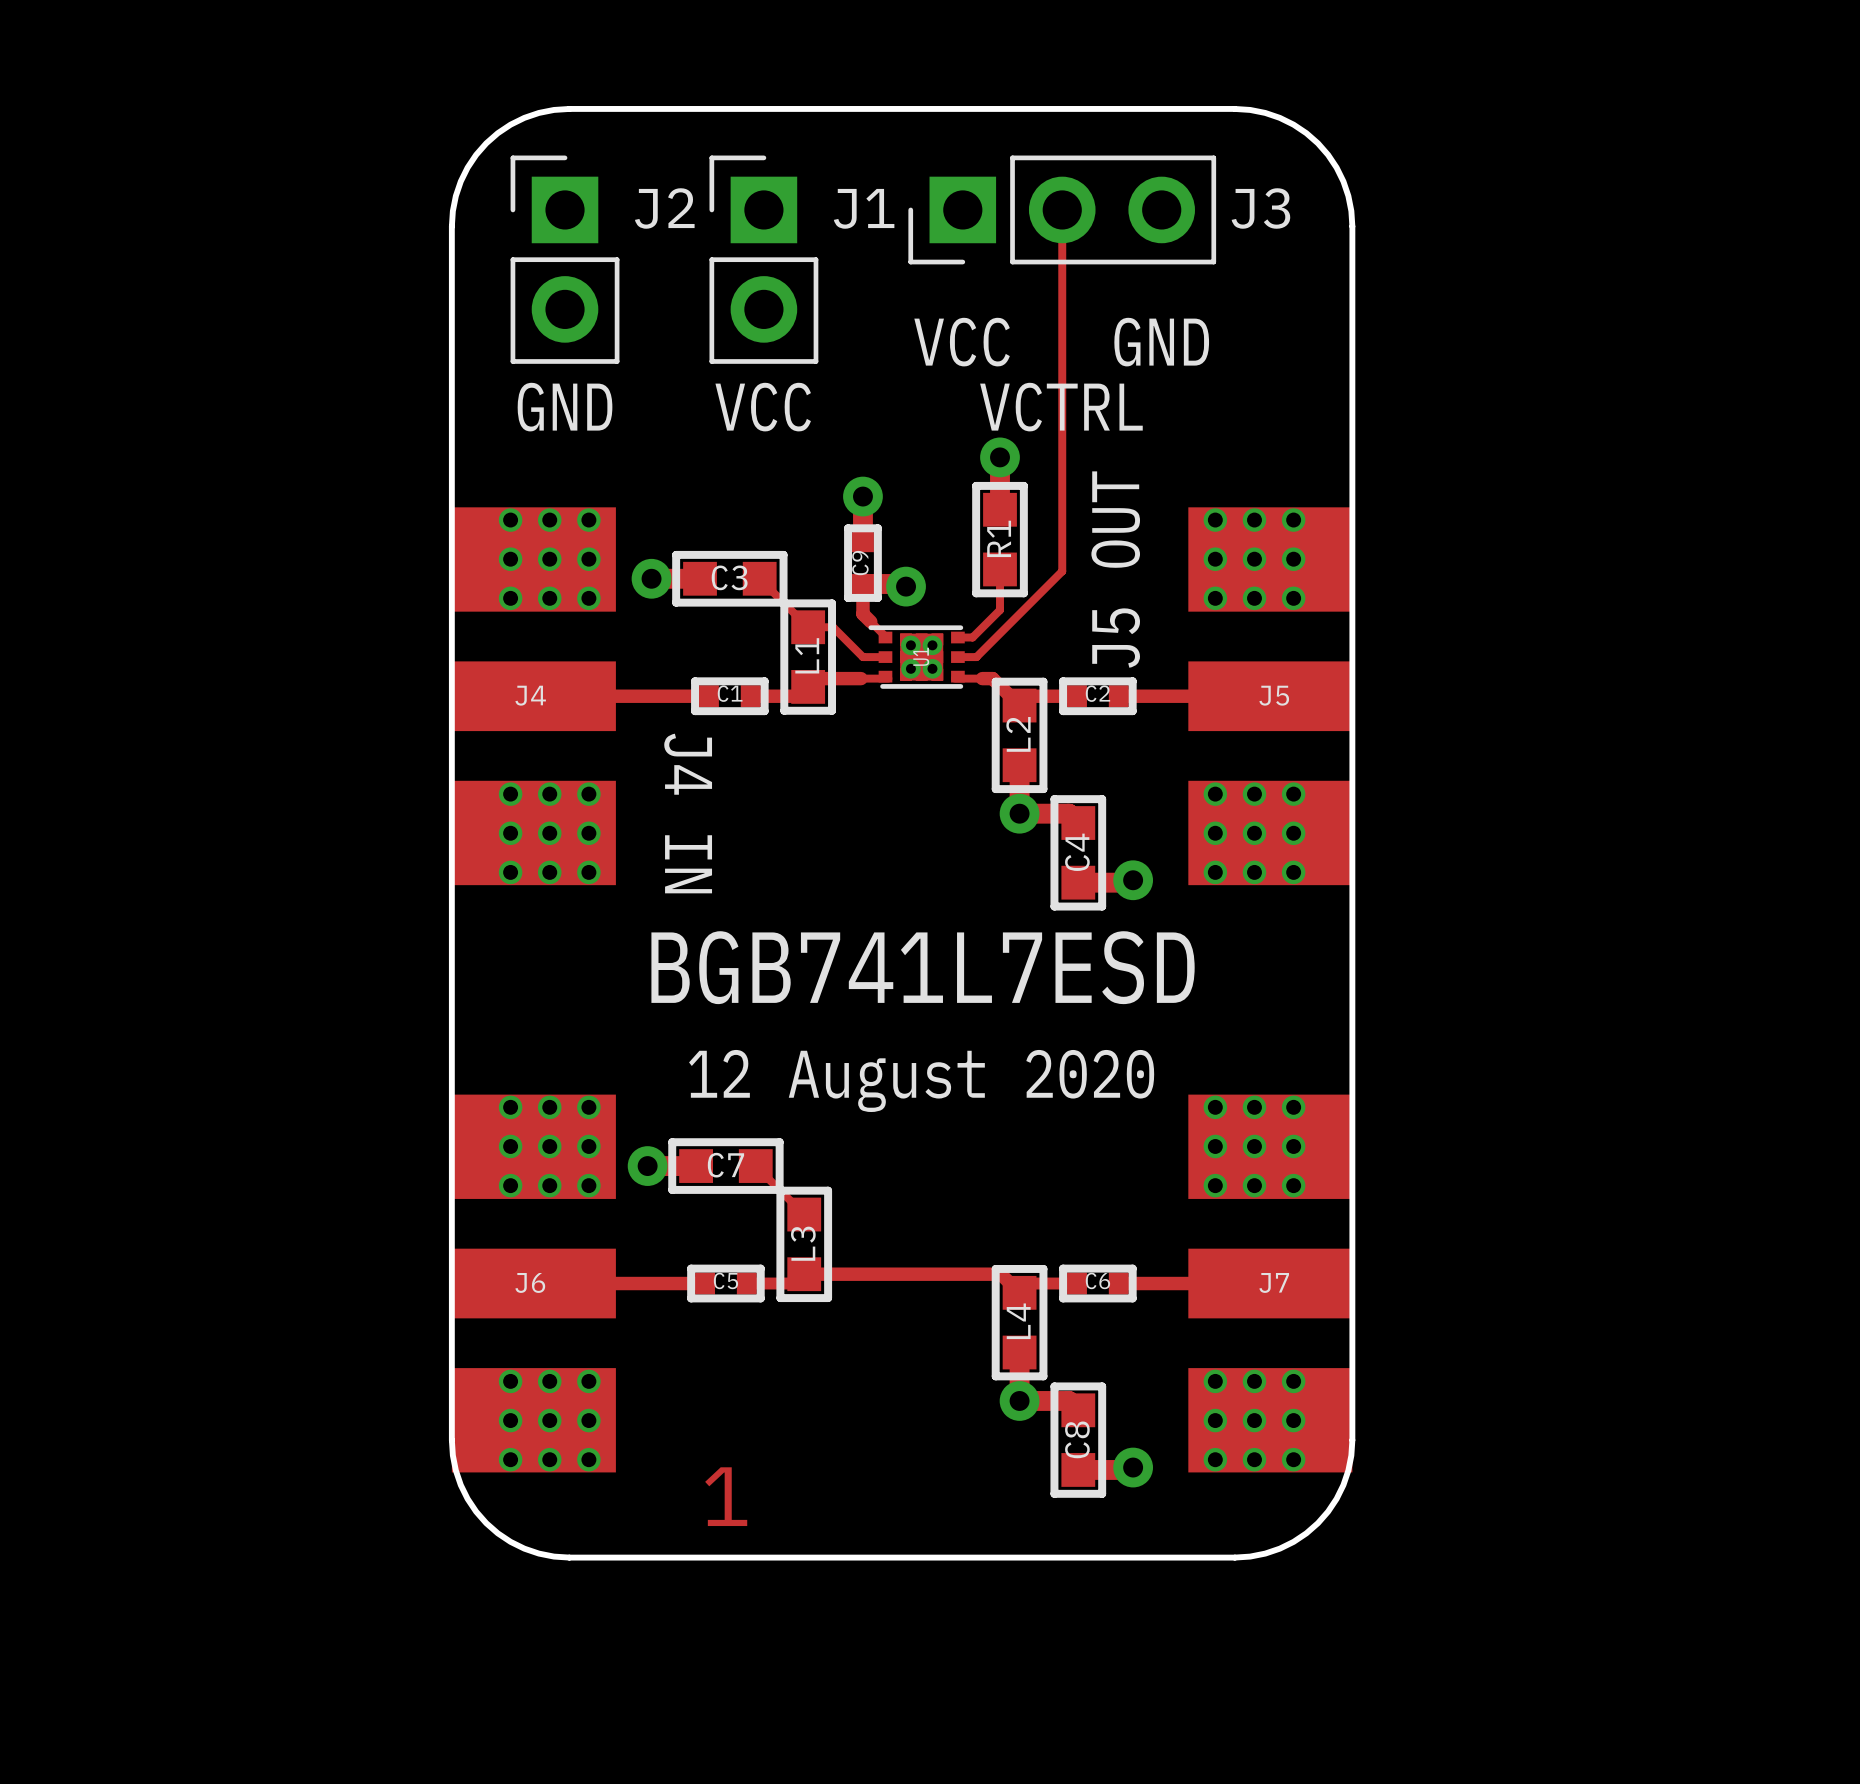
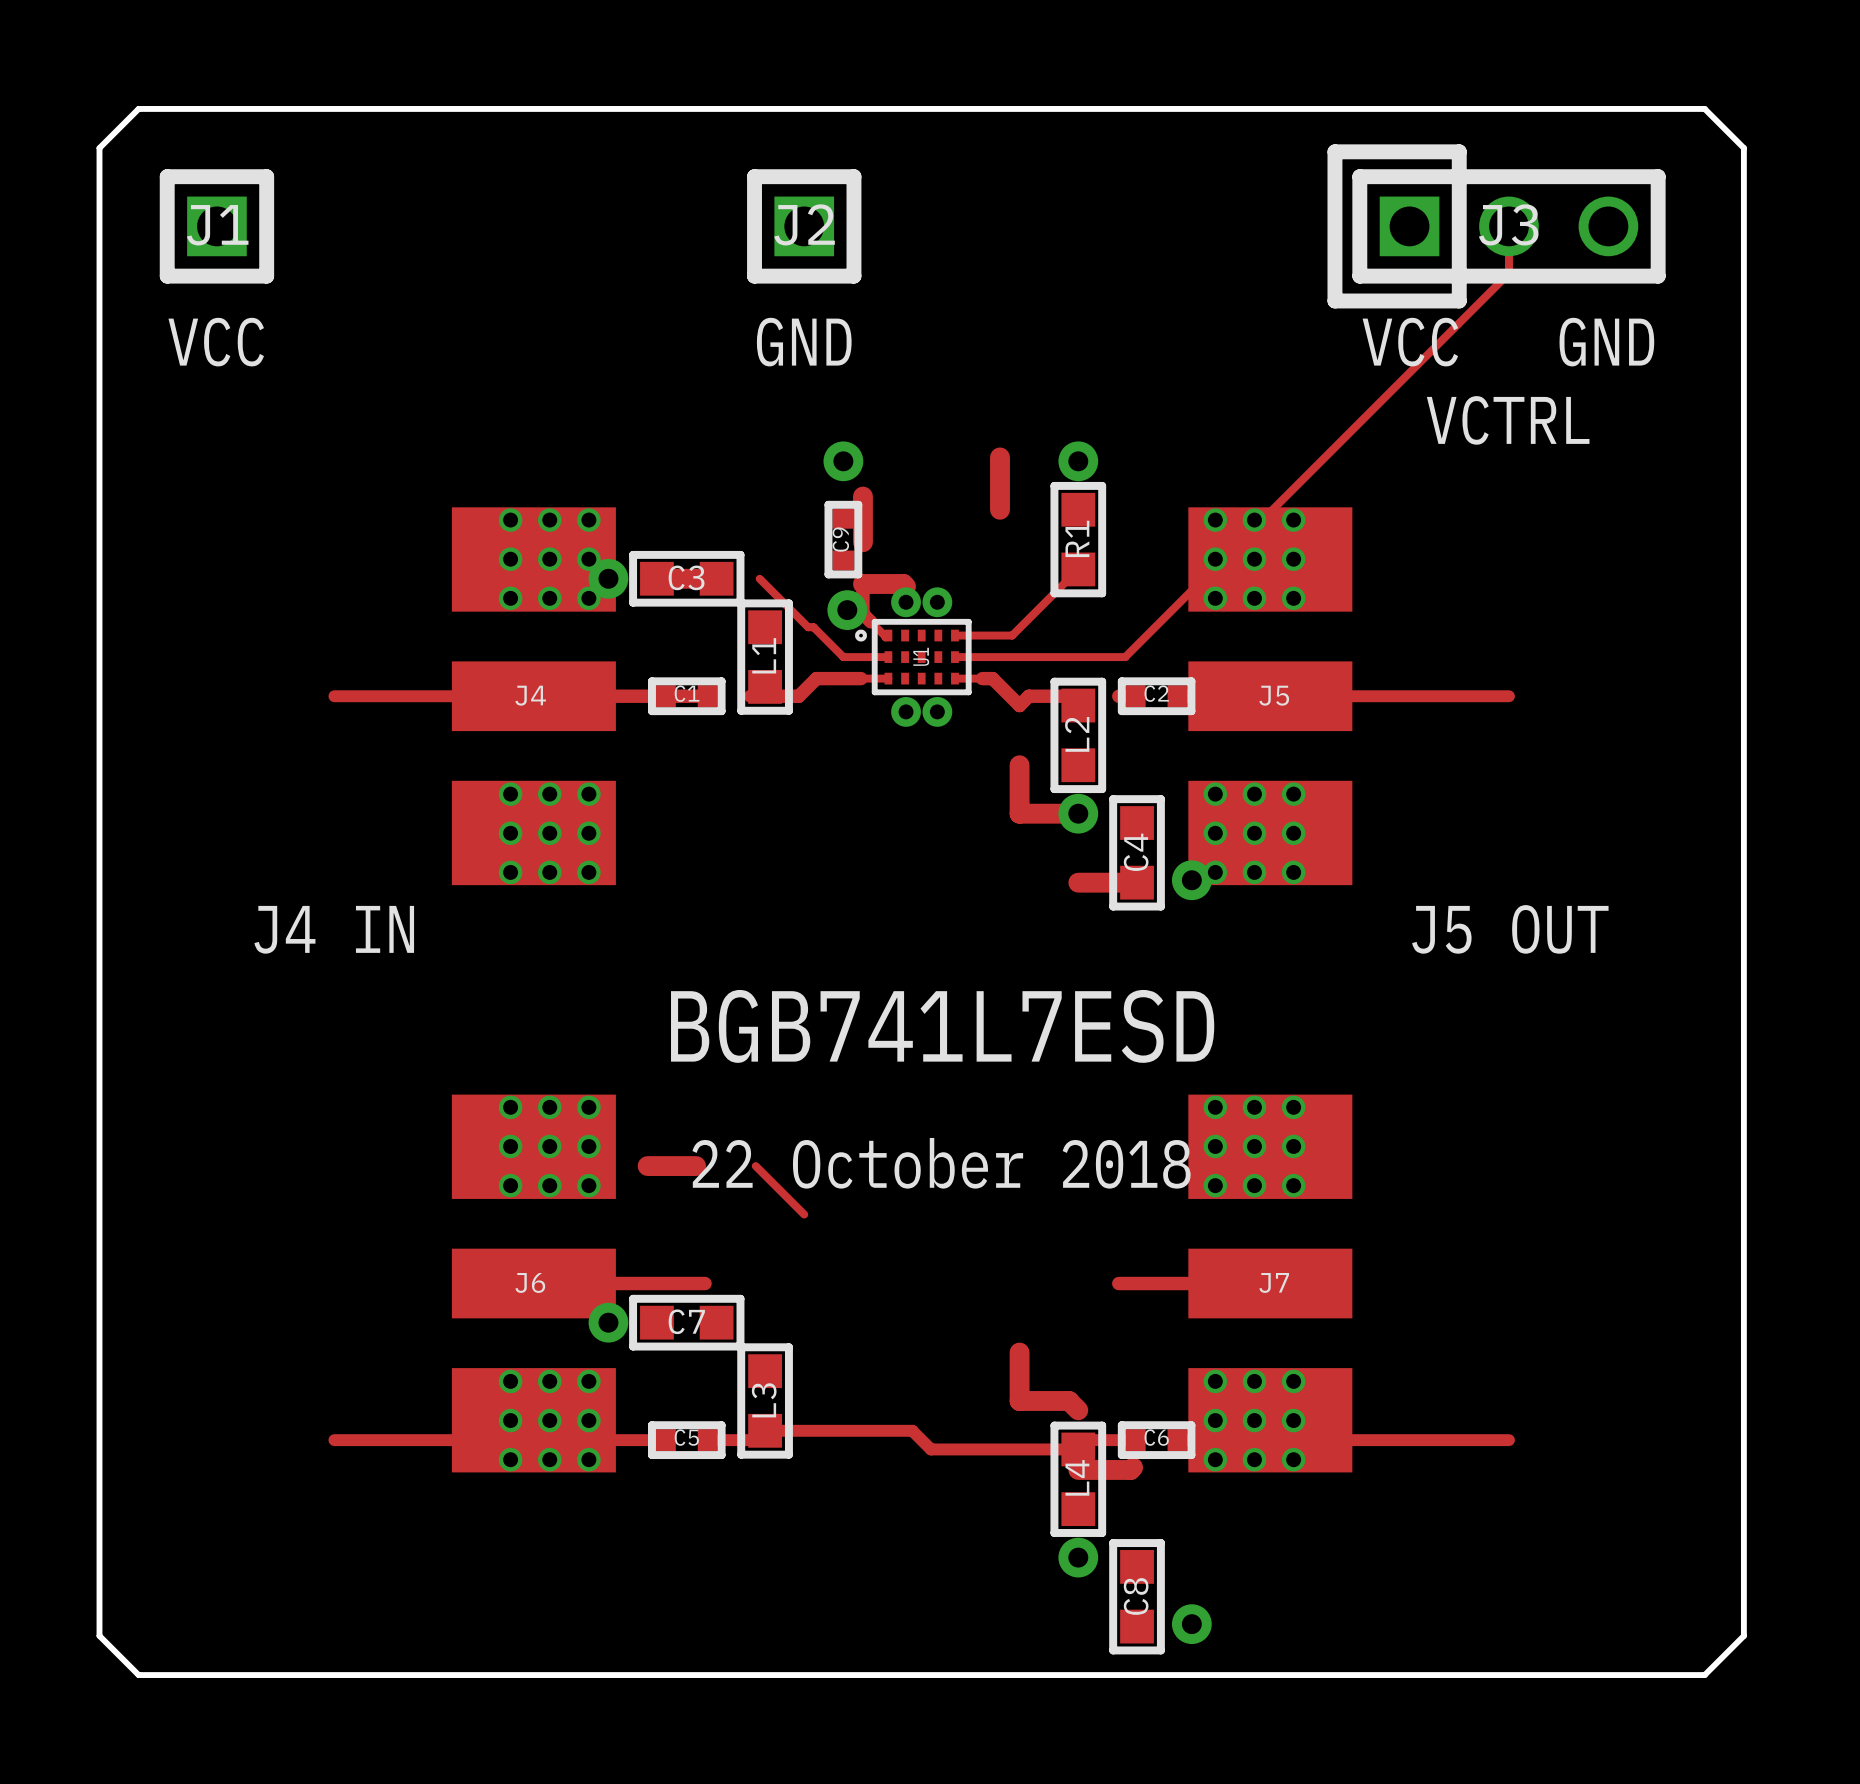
board edge: (569, 108) (553, 109) (524, 117) (497, 133) (486, 143) (476, 154) (460, 181) (452, 211) (451, 226) (452, 1455) (460, 1485) (467, 1498) (476, 1511) (497, 1533) (524, 1548) (553, 1556) (569, 1557) (1250, 1556) (1279, 1548) (1306, 1533) (1328, 1511) (1343, 1485) (1351, 1455) (1352, 1440) (1351, 211) (1343, 181) (1336, 167) (1328, 154) (1306, 133) (1279, 117) (1250, 109) (1234, 108) -> (569, 108) (138, 108) (99, 148) (99, 1635) (138, 1675) (1704, 1675) (1743, 1635) (1743, 148) (1704, 108) (1234, 108)
J2 footprint: [510, 155, 620, 364] -> [747, 169, 862, 284]
J1 footprint: [709, 155, 819, 364] -> [159, 169, 275, 284]
J3 footprint: [908, 155, 1217, 265] -> [1327, 144, 1666, 309]
J2 name position: J2 (664, 208) -> J2 (804, 224)
J1 name position: J1 (864, 208) -> J1 (217, 225)
J3 name position: J3 (1260, 208) -> J3 (1508, 224)
track: (1062, 209) (1062, 571) (976, 657) -> (1508, 226) (1508, 273) (1125, 657) (976, 657)
text: none -> VCC (216, 342)
text: none -> GND (804, 342)
text: VCC (962, 342) -> none
text: GND (1161, 342) -> none
text: none -> VCC (1410, 342)
text: none -> GND (1606, 342)
text: GND (565, 407) -> none
text: VCC (763, 407) -> none
text position: VCTRL (1061, 407) -> VCTRL (1508, 420)
via: (1000, 457) -> none
via: none -> (1078, 461)
via position: (862, 496) -> (843, 461)
R1 position: (1000, 539) -> (1078, 539)
C9 position: (862, 563) -> (843, 539)
via size: [886, 566, 926, 607] -> [891, 587, 921, 618]
track: (1000, 569) (1000, 610) (972, 637) (957, 637) -> none
track: none -> (1078, 569) (1012, 635) (954, 635)
text rotation: 0° (1115, 569) -> 90° clockwise (1510, 929)
text position: J5 OUT (1115, 569) -> J5 OUT (1510, 929)
via position: (651, 578) -> (608, 578)
C3 position: (729, 578) -> (686, 578)
via: none -> (937, 602)
via: none -> (847, 610)
U1 footprint: [868, 625, 965, 689] -> [855, 618, 972, 696]
track: (813, 627) (833, 627) (862, 657) -> (813, 627) (843, 657) (862, 657)
L1 position: (808, 657) -> (765, 657)
track: none -> (334, 696) (533, 696)
C1 position: (729, 696) -> (686, 696)
C2 position: (1097, 696) -> (1156, 696)
track: (1135, 696) (1177, 696) -> none
track: none -> (1270, 696) (1508, 696)
via: none -> (906, 711)
via: none -> (937, 711)
L2 position: (1019, 735) -> (1078, 735)
text rotation: 0° (688, 813) -> 90° counterclockwise (334, 929)
text position: J4 IN (688, 813) -> J4 IN (334, 929)
via: (1019, 813) -> none
via: none -> (1078, 813)
C4 position: (1078, 852) -> (1137, 852)
via: (1133, 880) -> none
via: none -> (1191, 880)
text position: BGB741L7ESD (923, 967) -> BGB741L7ESD (942, 1026)
text: 12 August 2020 (921, 1080) -> none
text: none -> 22 October 2018 (941, 1163)
via position: (647, 1166) -> (608, 1322)
C7 position: (725, 1166) -> (686, 1322)
L3 position: (804, 1244) -> (765, 1400)
C5 position: (725, 1283) -> (686, 1440)
track: (746, 1283) (794, 1283) (804, 1274) (1000, 1274) (1019, 1292) (1028, 1283) (1077, 1283) -> none
C6 position: (1097, 1283) -> (1156, 1440)
L4 position: (1019, 1322) -> (1078, 1479)
via: (1019, 1400) -> none
track: none -> (334, 1440) (665, 1440)
track: none -> (707, 1440) (755, 1440) (765, 1430) (912, 1430) (931, 1449) (1078, 1449) (1087, 1440) (1135, 1440)
C8 position: (1078, 1440) -> (1137, 1596)
track: none -> (1177, 1440) (1508, 1440)
via: (1133, 1467) -> none
text: 1 (726, 1496) -> none
via: none -> (1078, 1557)
via: none -> (1191, 1624)

